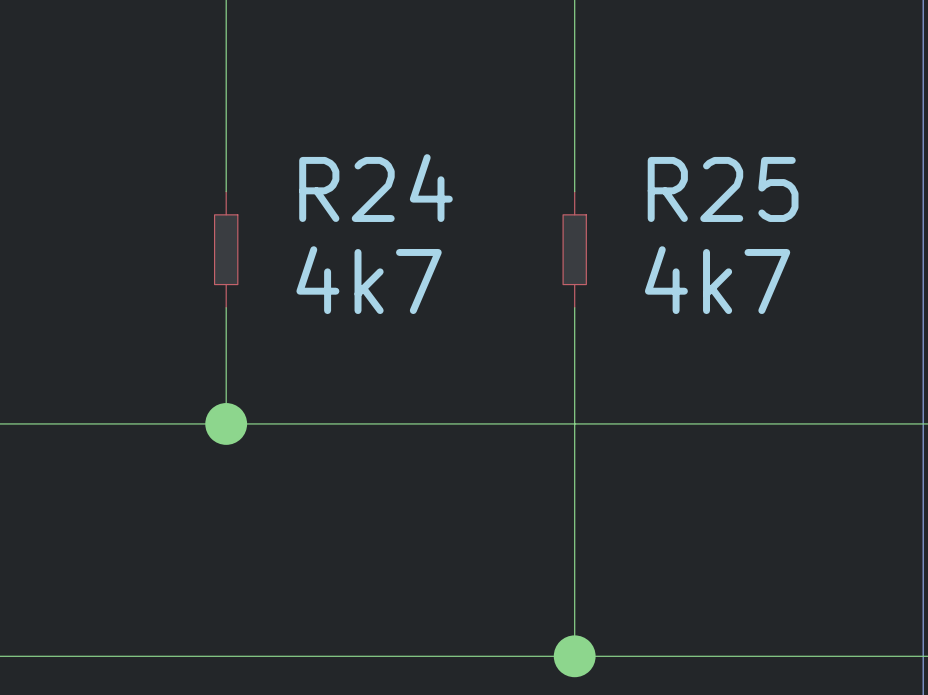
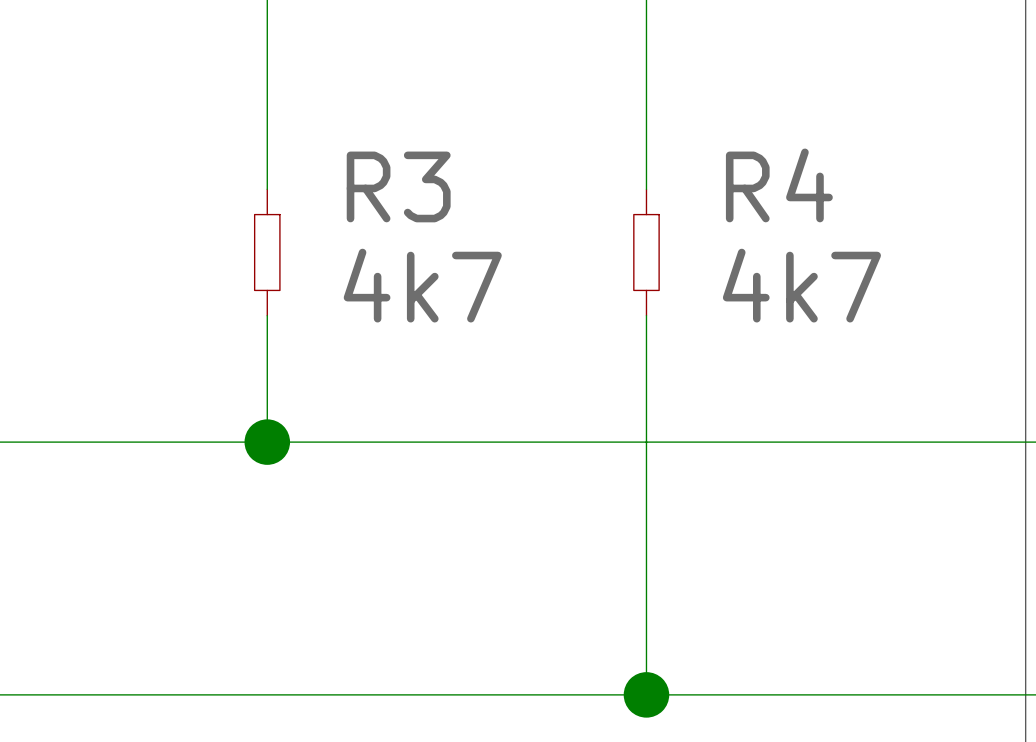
R24 name: R24 (375, 188) -> R3 (398, 186)
R25 name: R25 (723, 189) -> R4 (779, 185)

